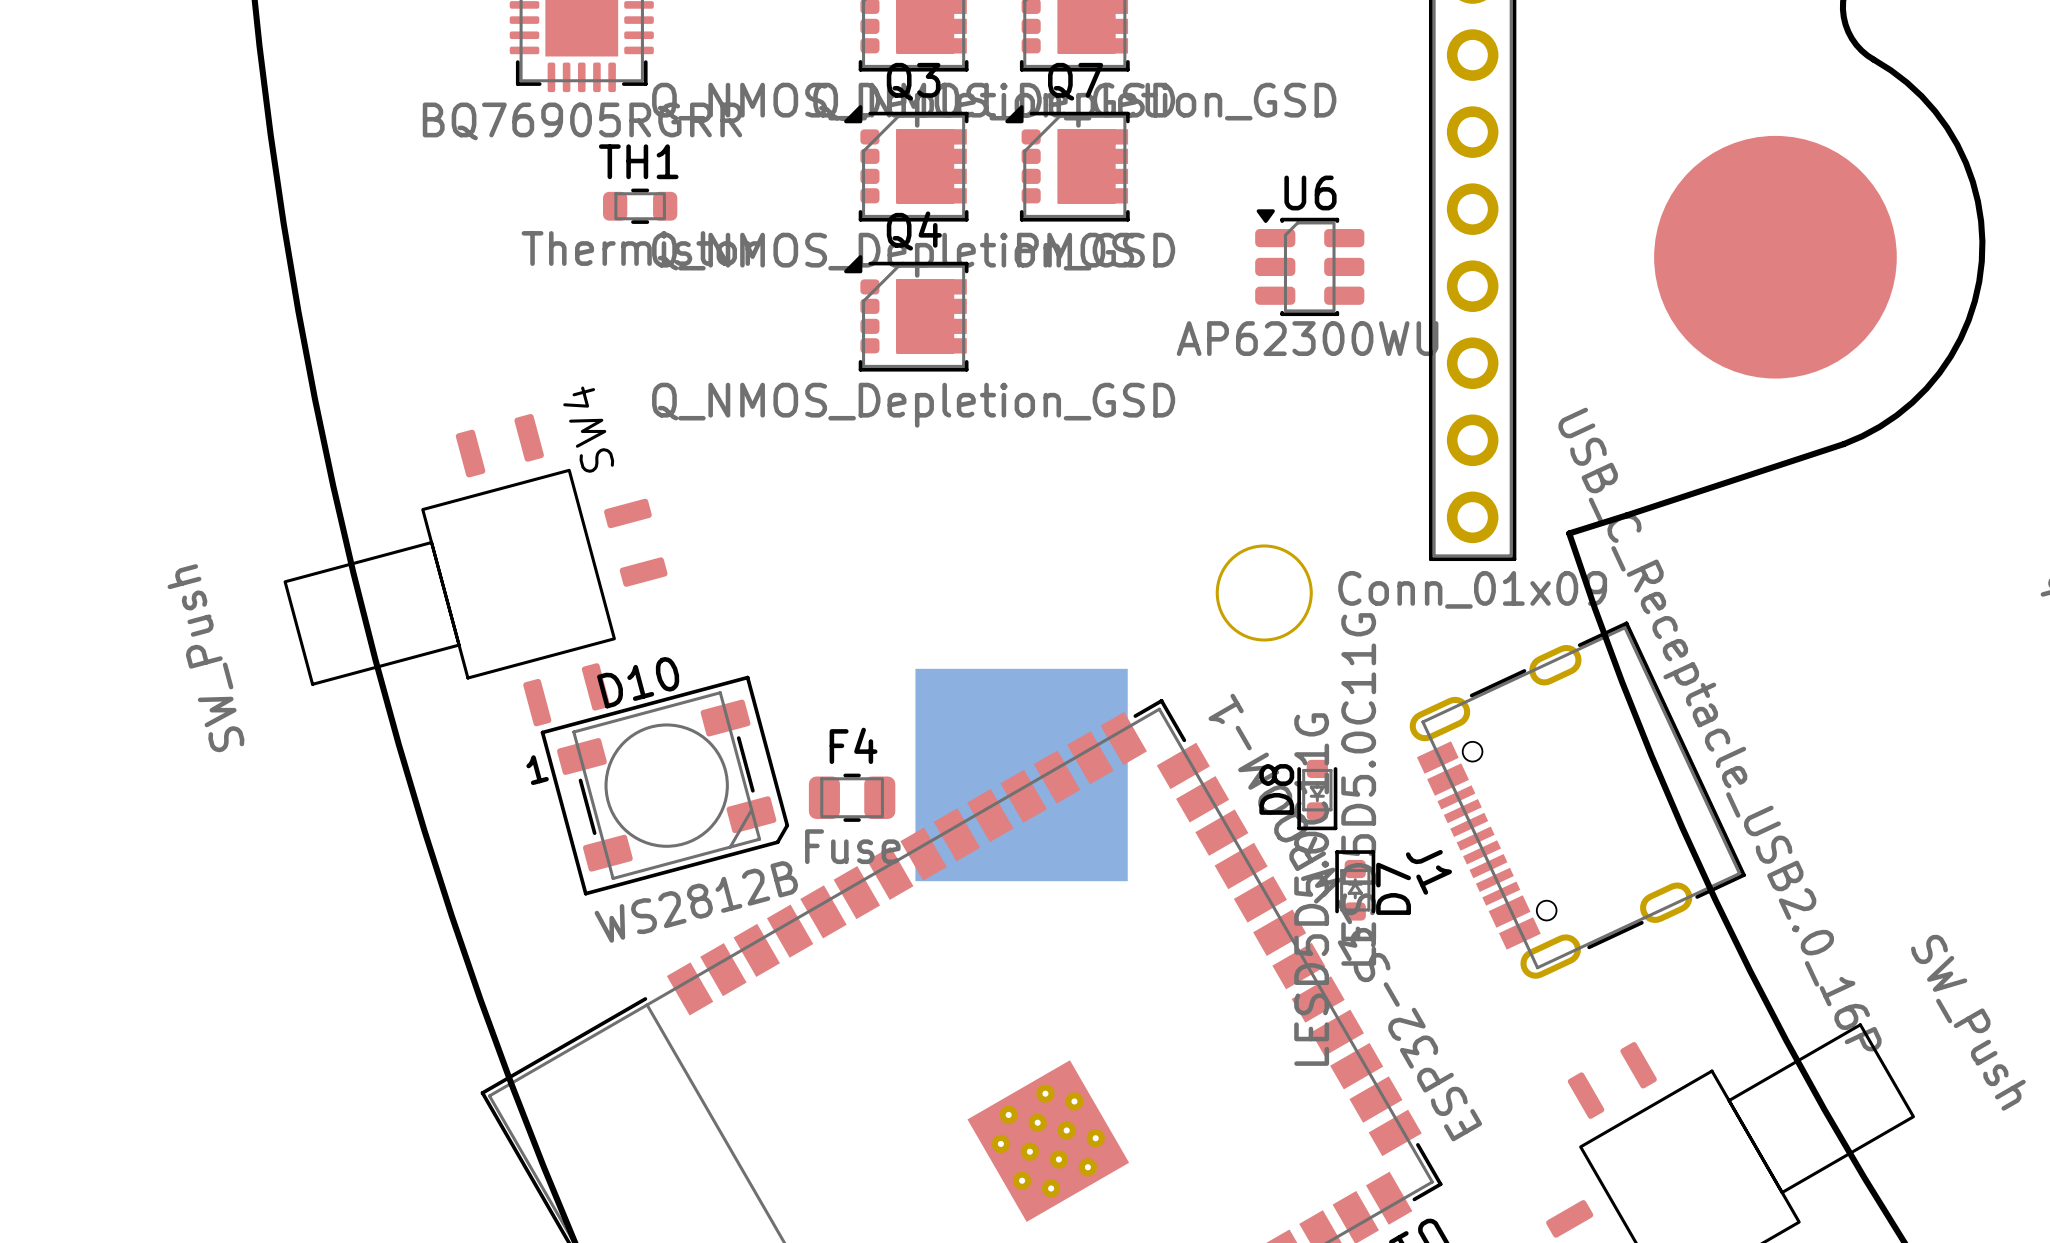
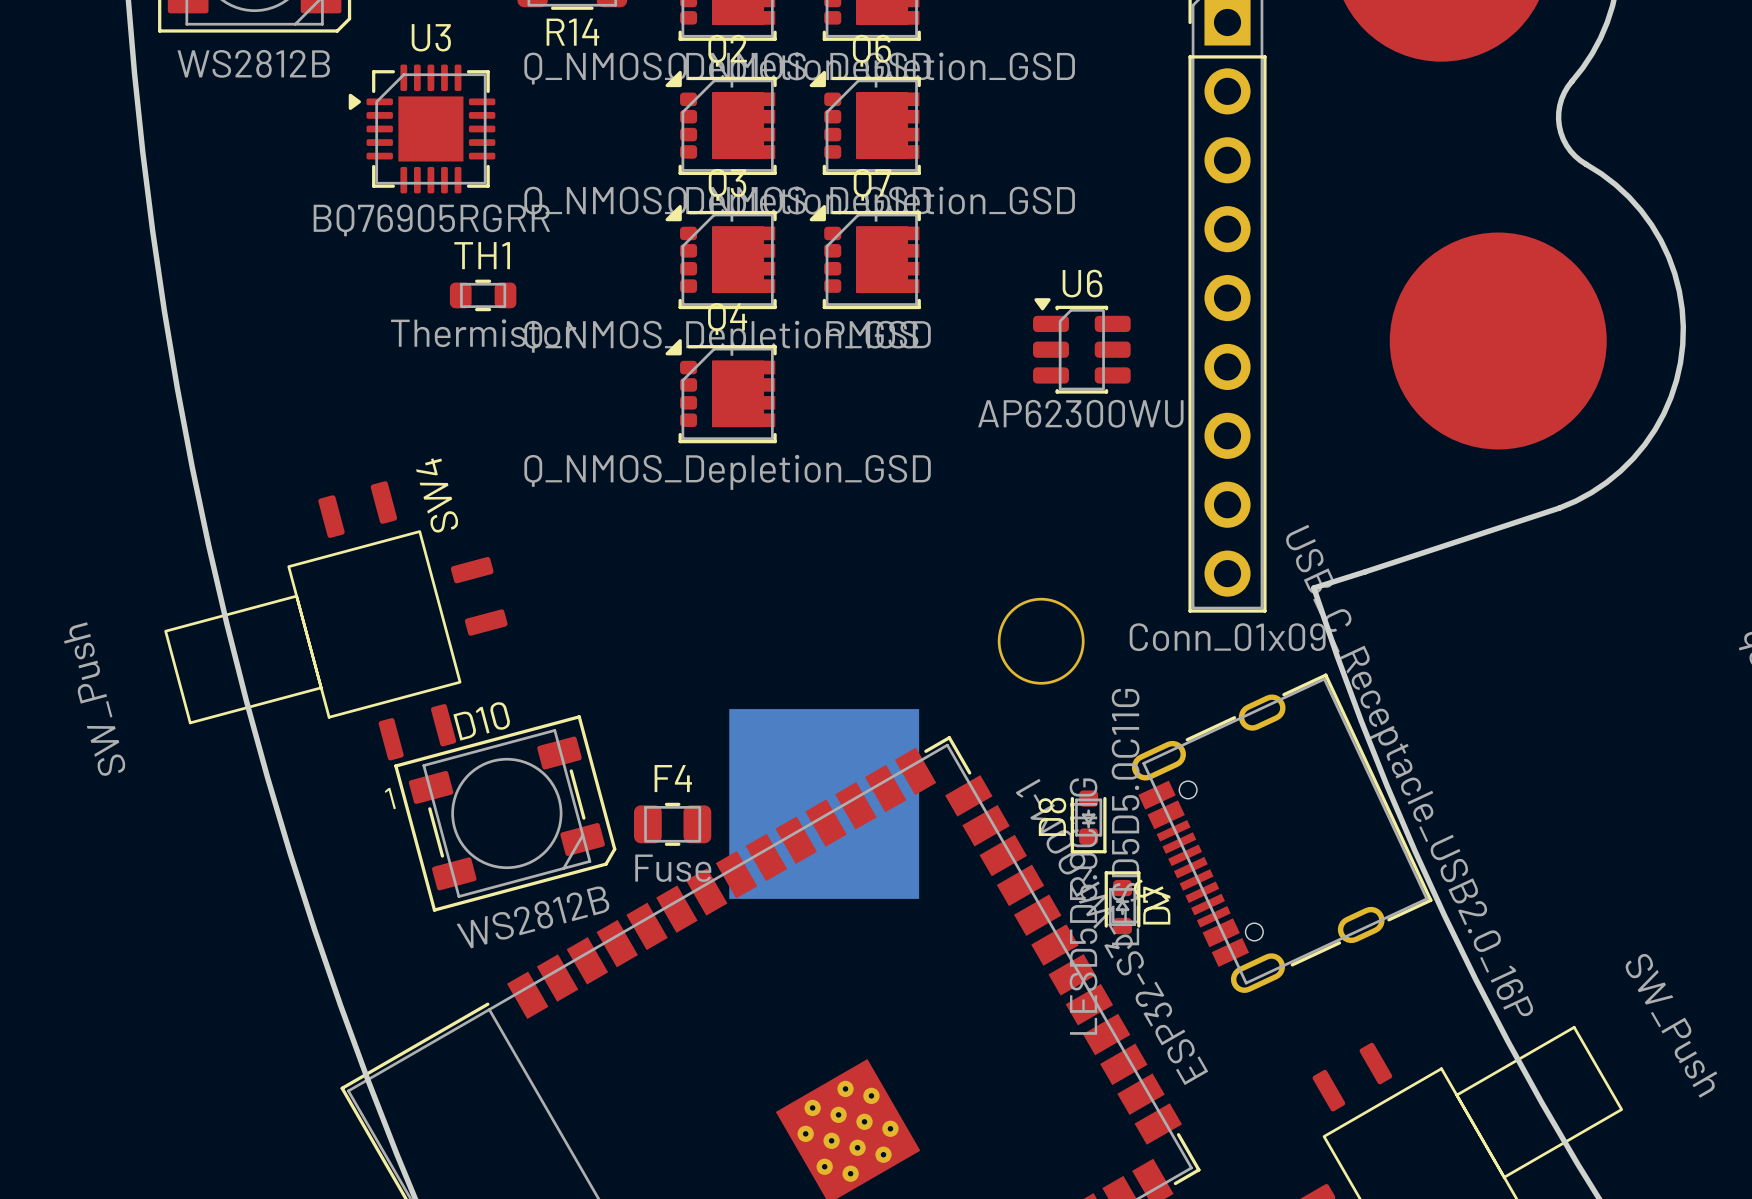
J1 position: (1577, 800) -> (1282, 833)

